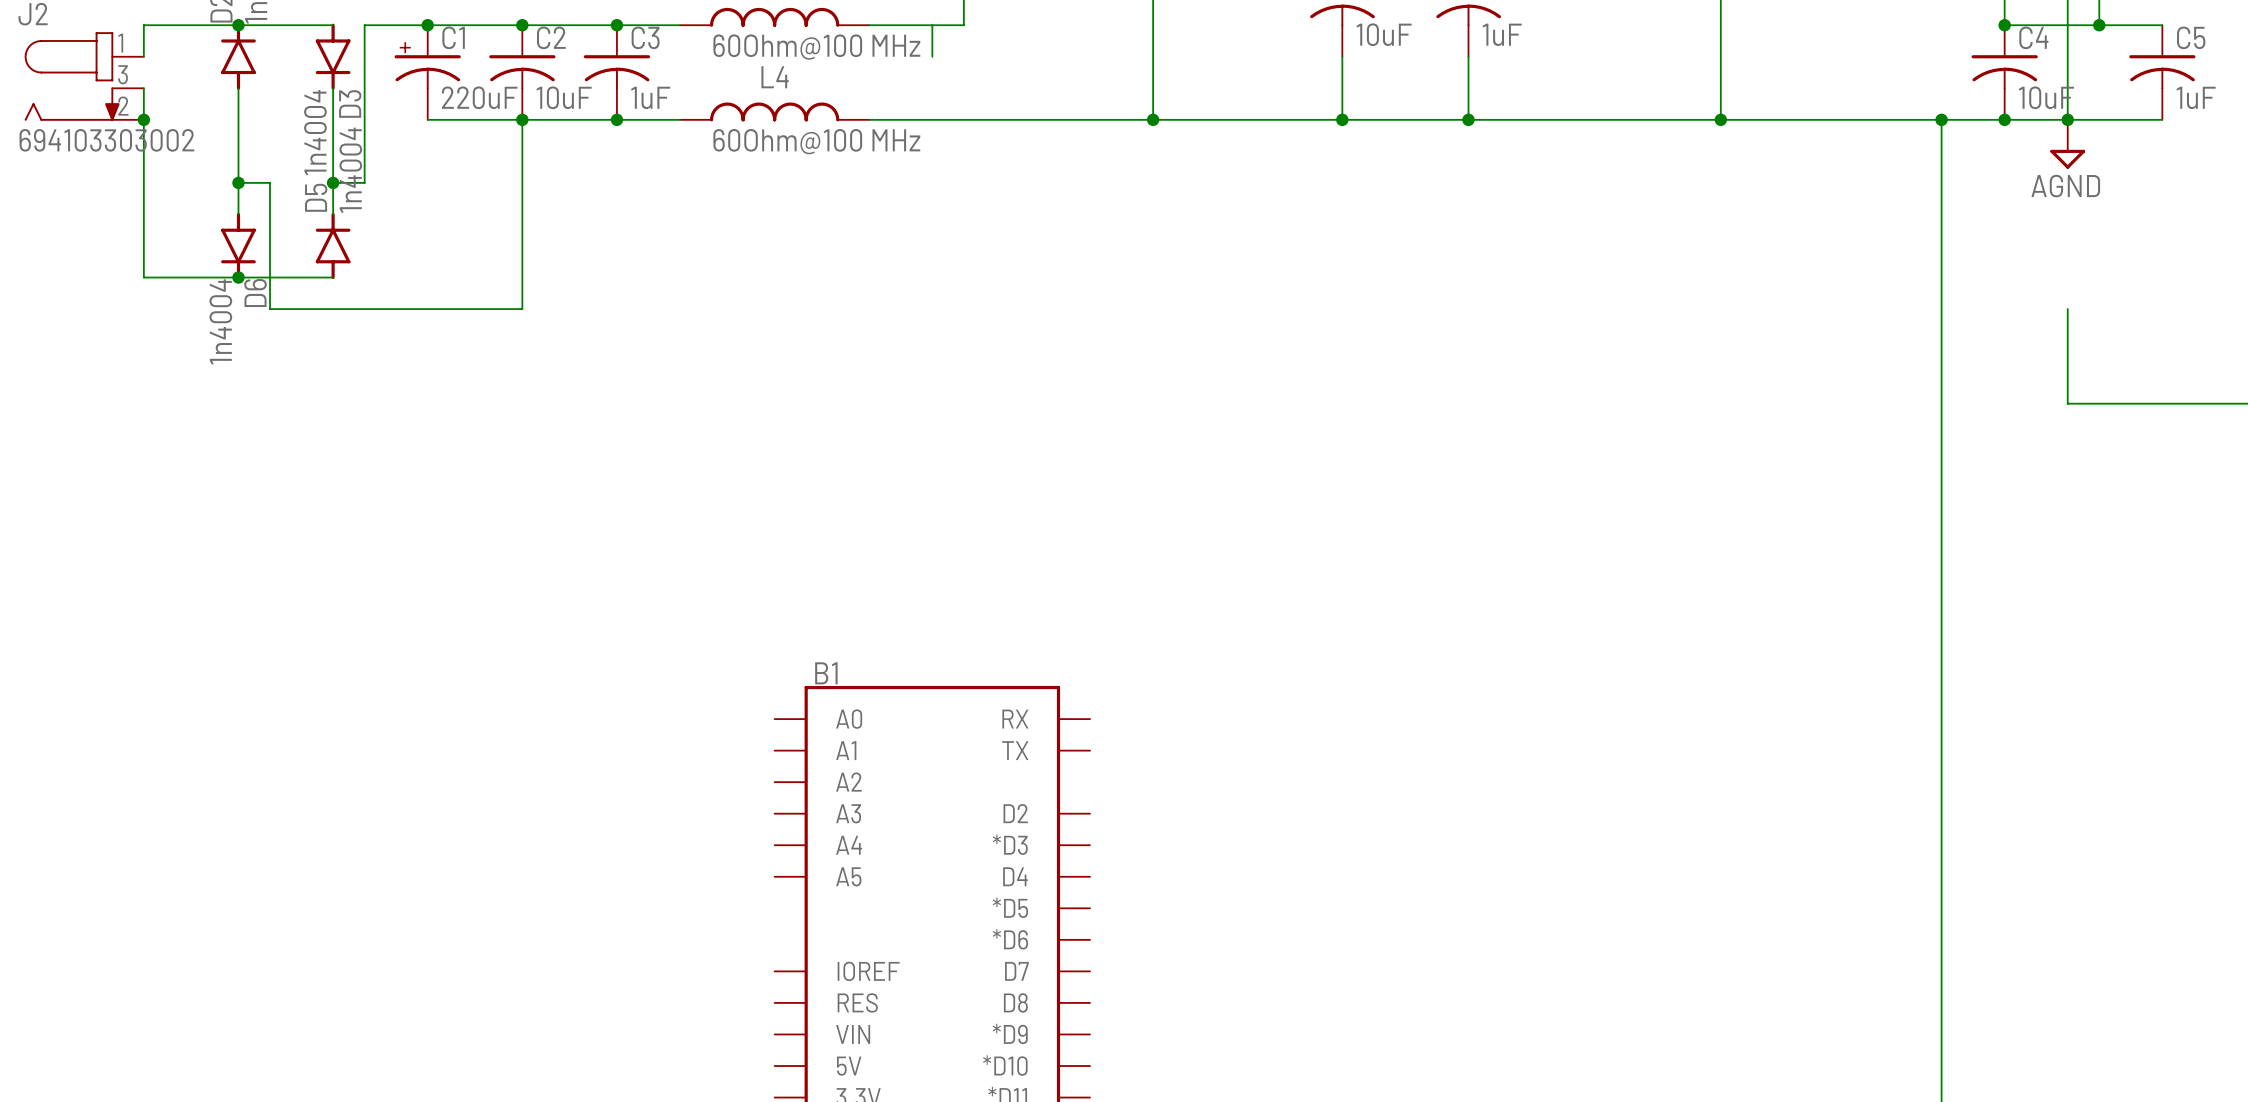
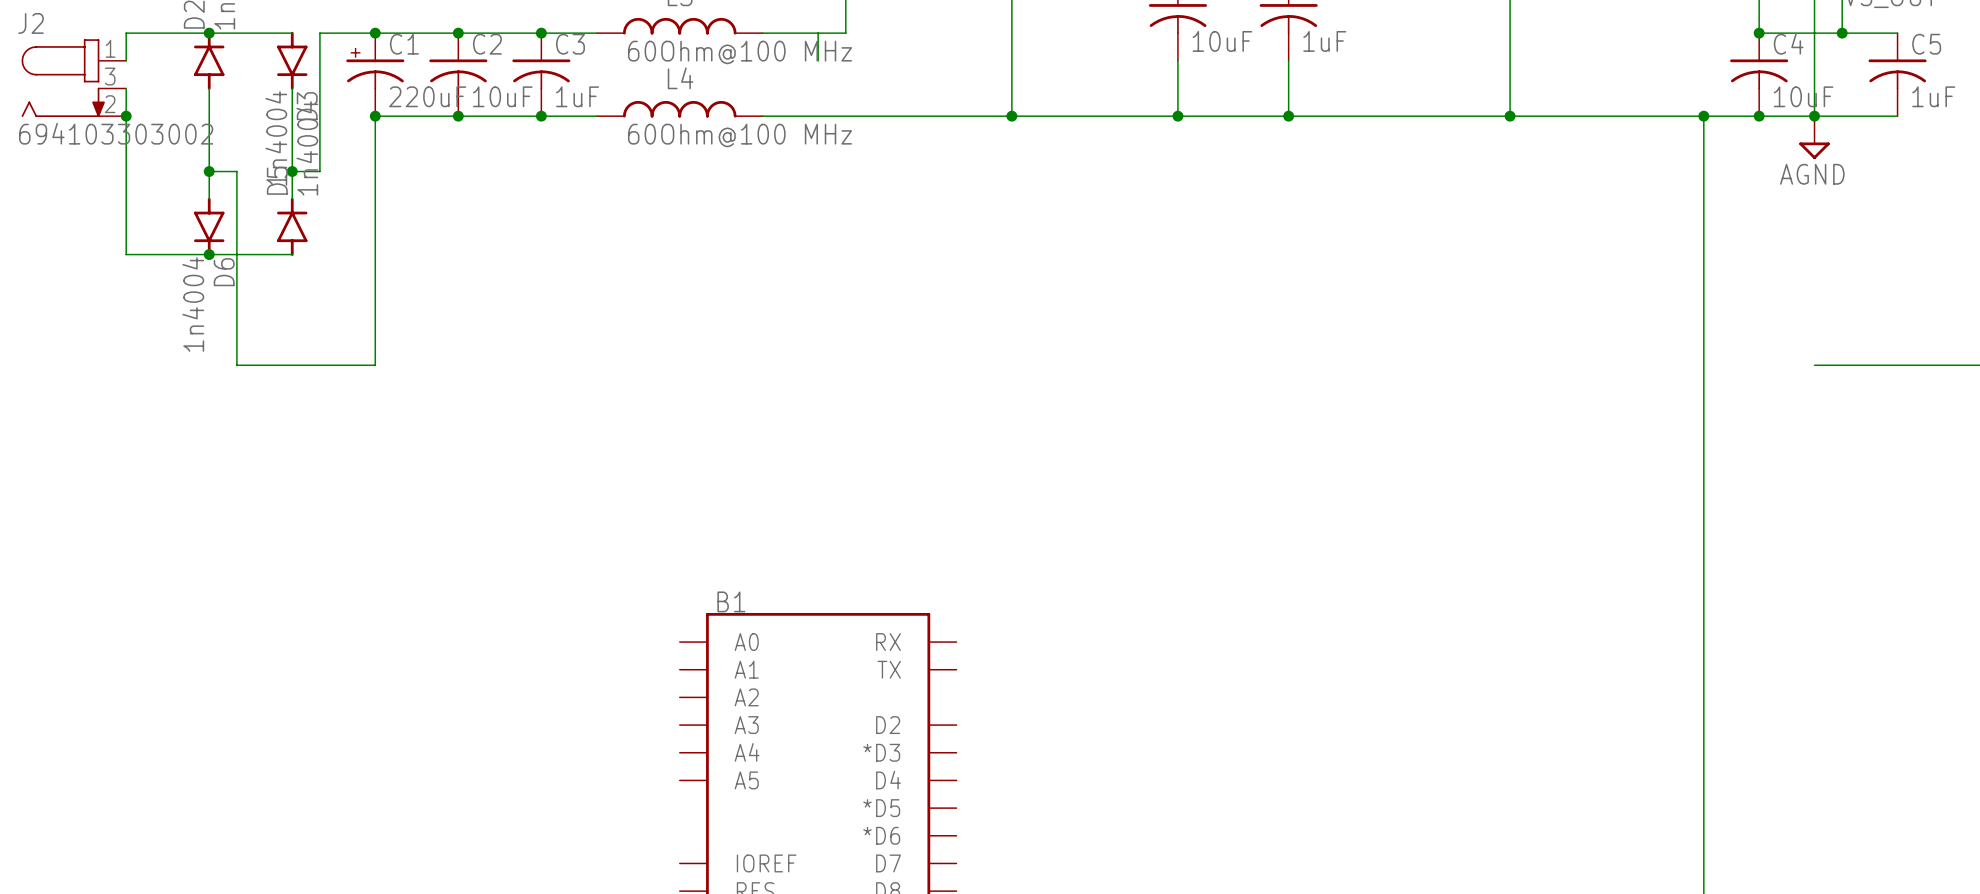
junction: none -> (375, 116)
wire: (522, 119) (522, 309) (270, 309) -> (375, 116) (375, 365) (236, 365) (236, 282)
wire: (2067, 309) (2067, 403) -> none

